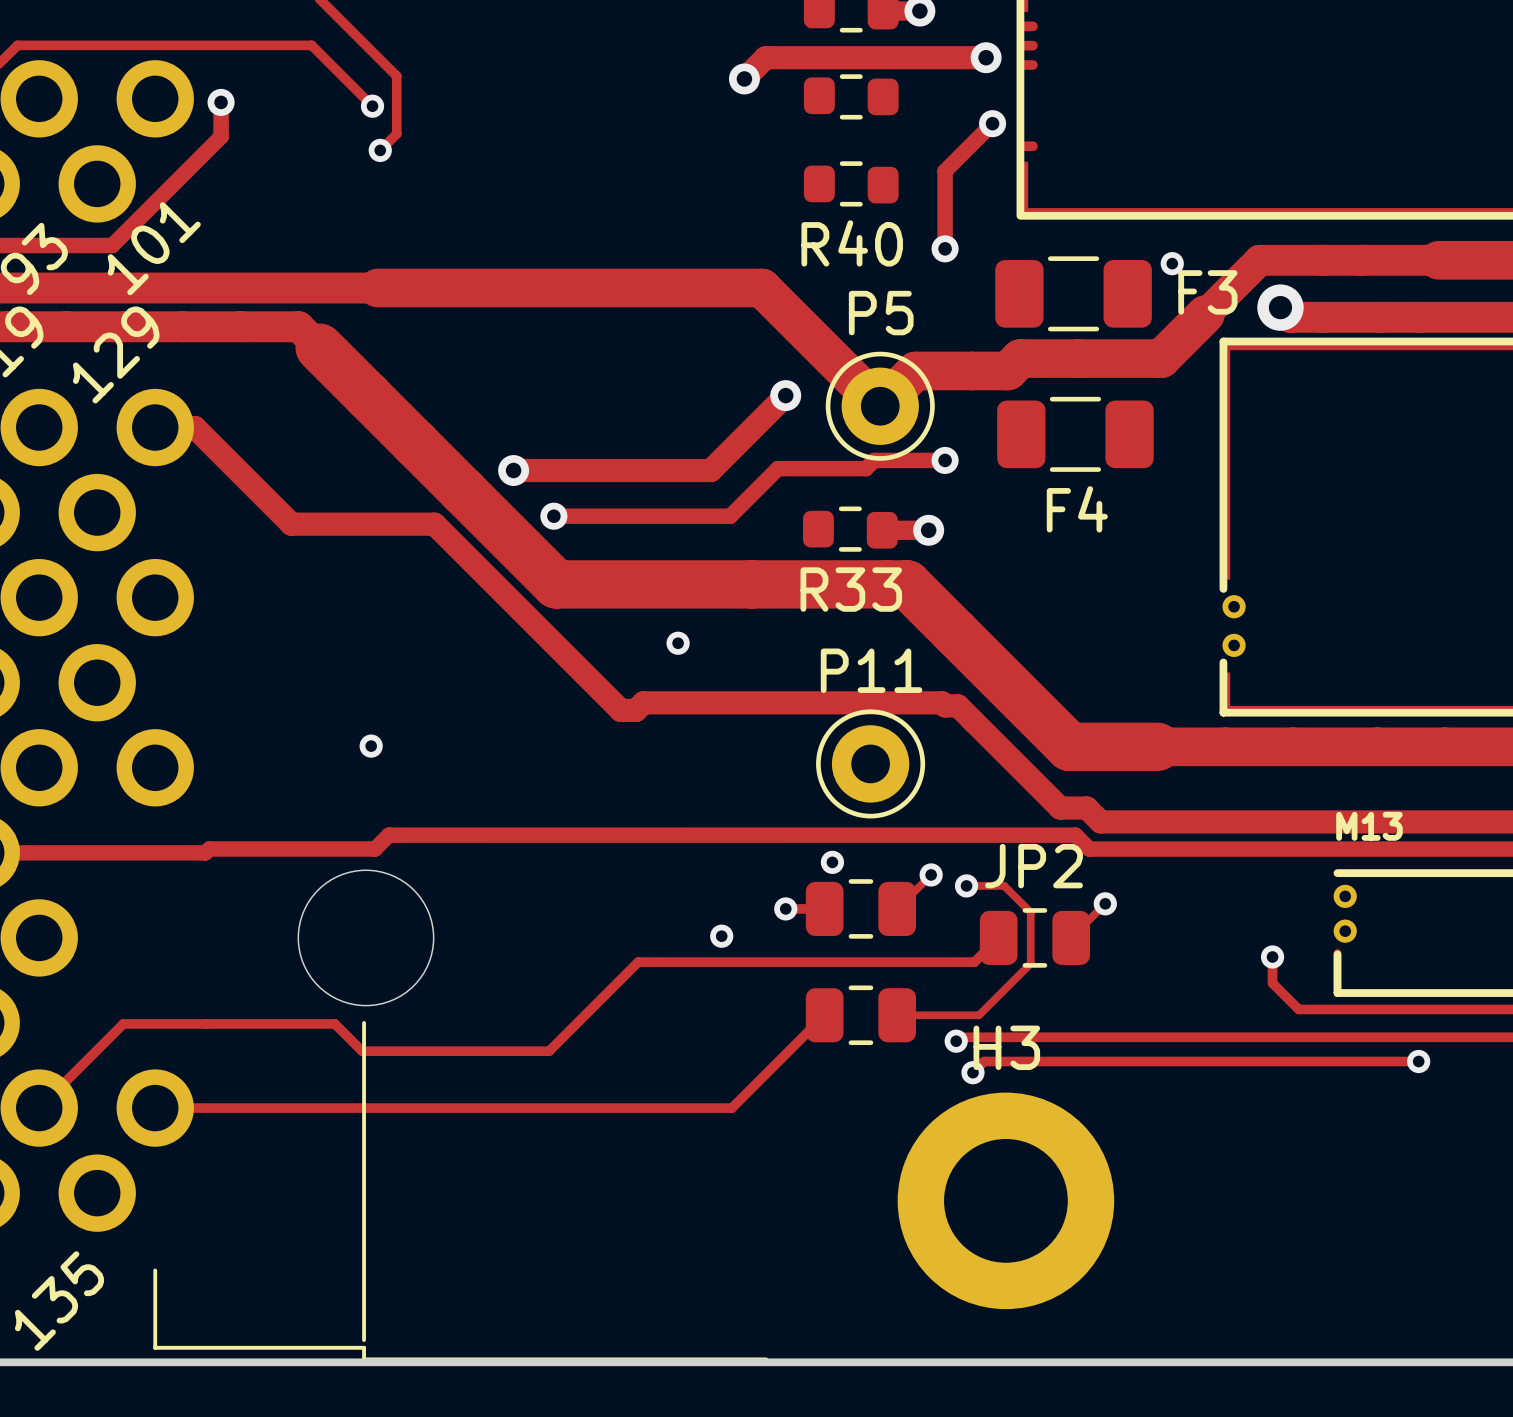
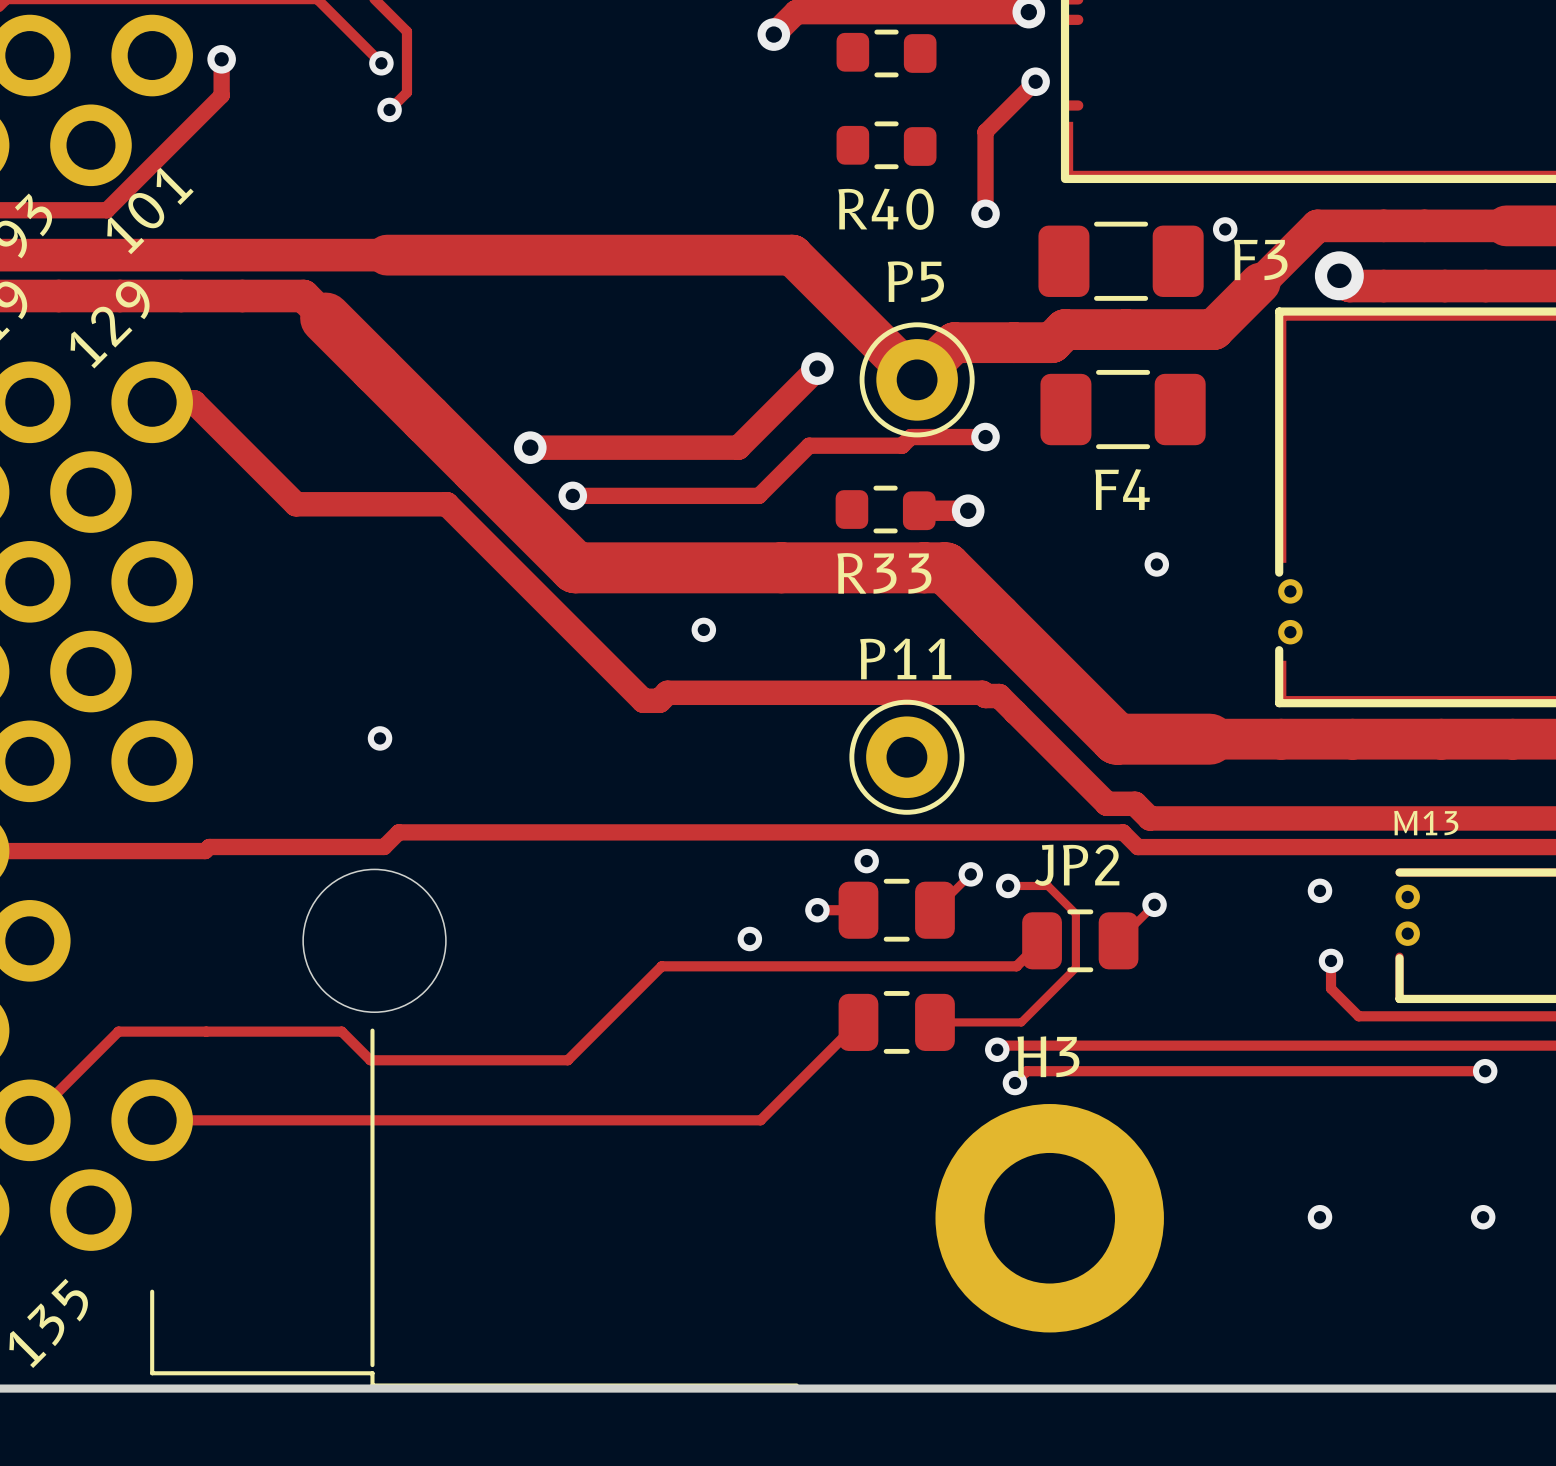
via: none -> (1156, 564)
via: none -> (1319, 890)
via: none -> (1319, 1217)
via: none -> (1483, 1217)

